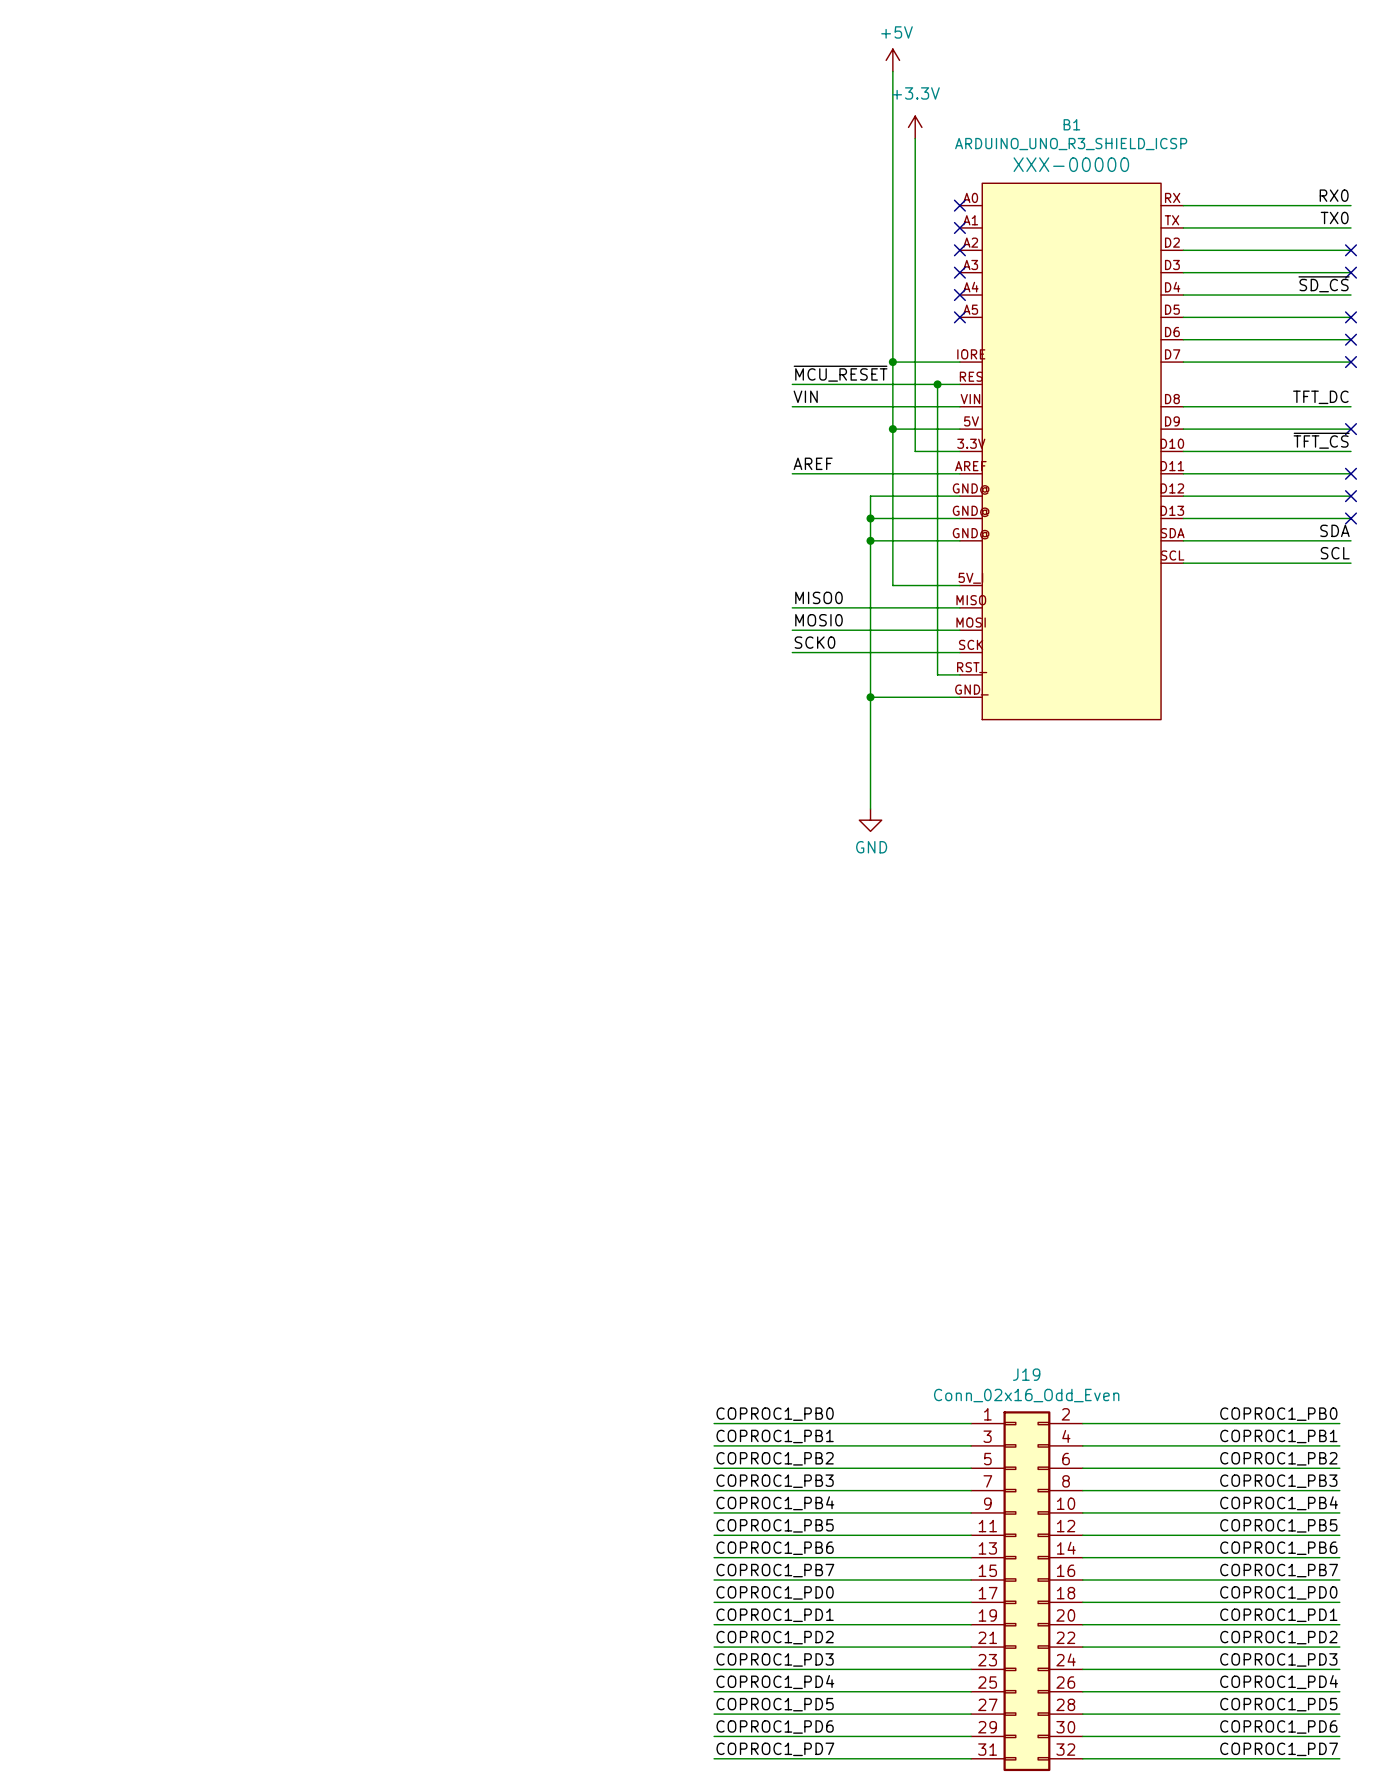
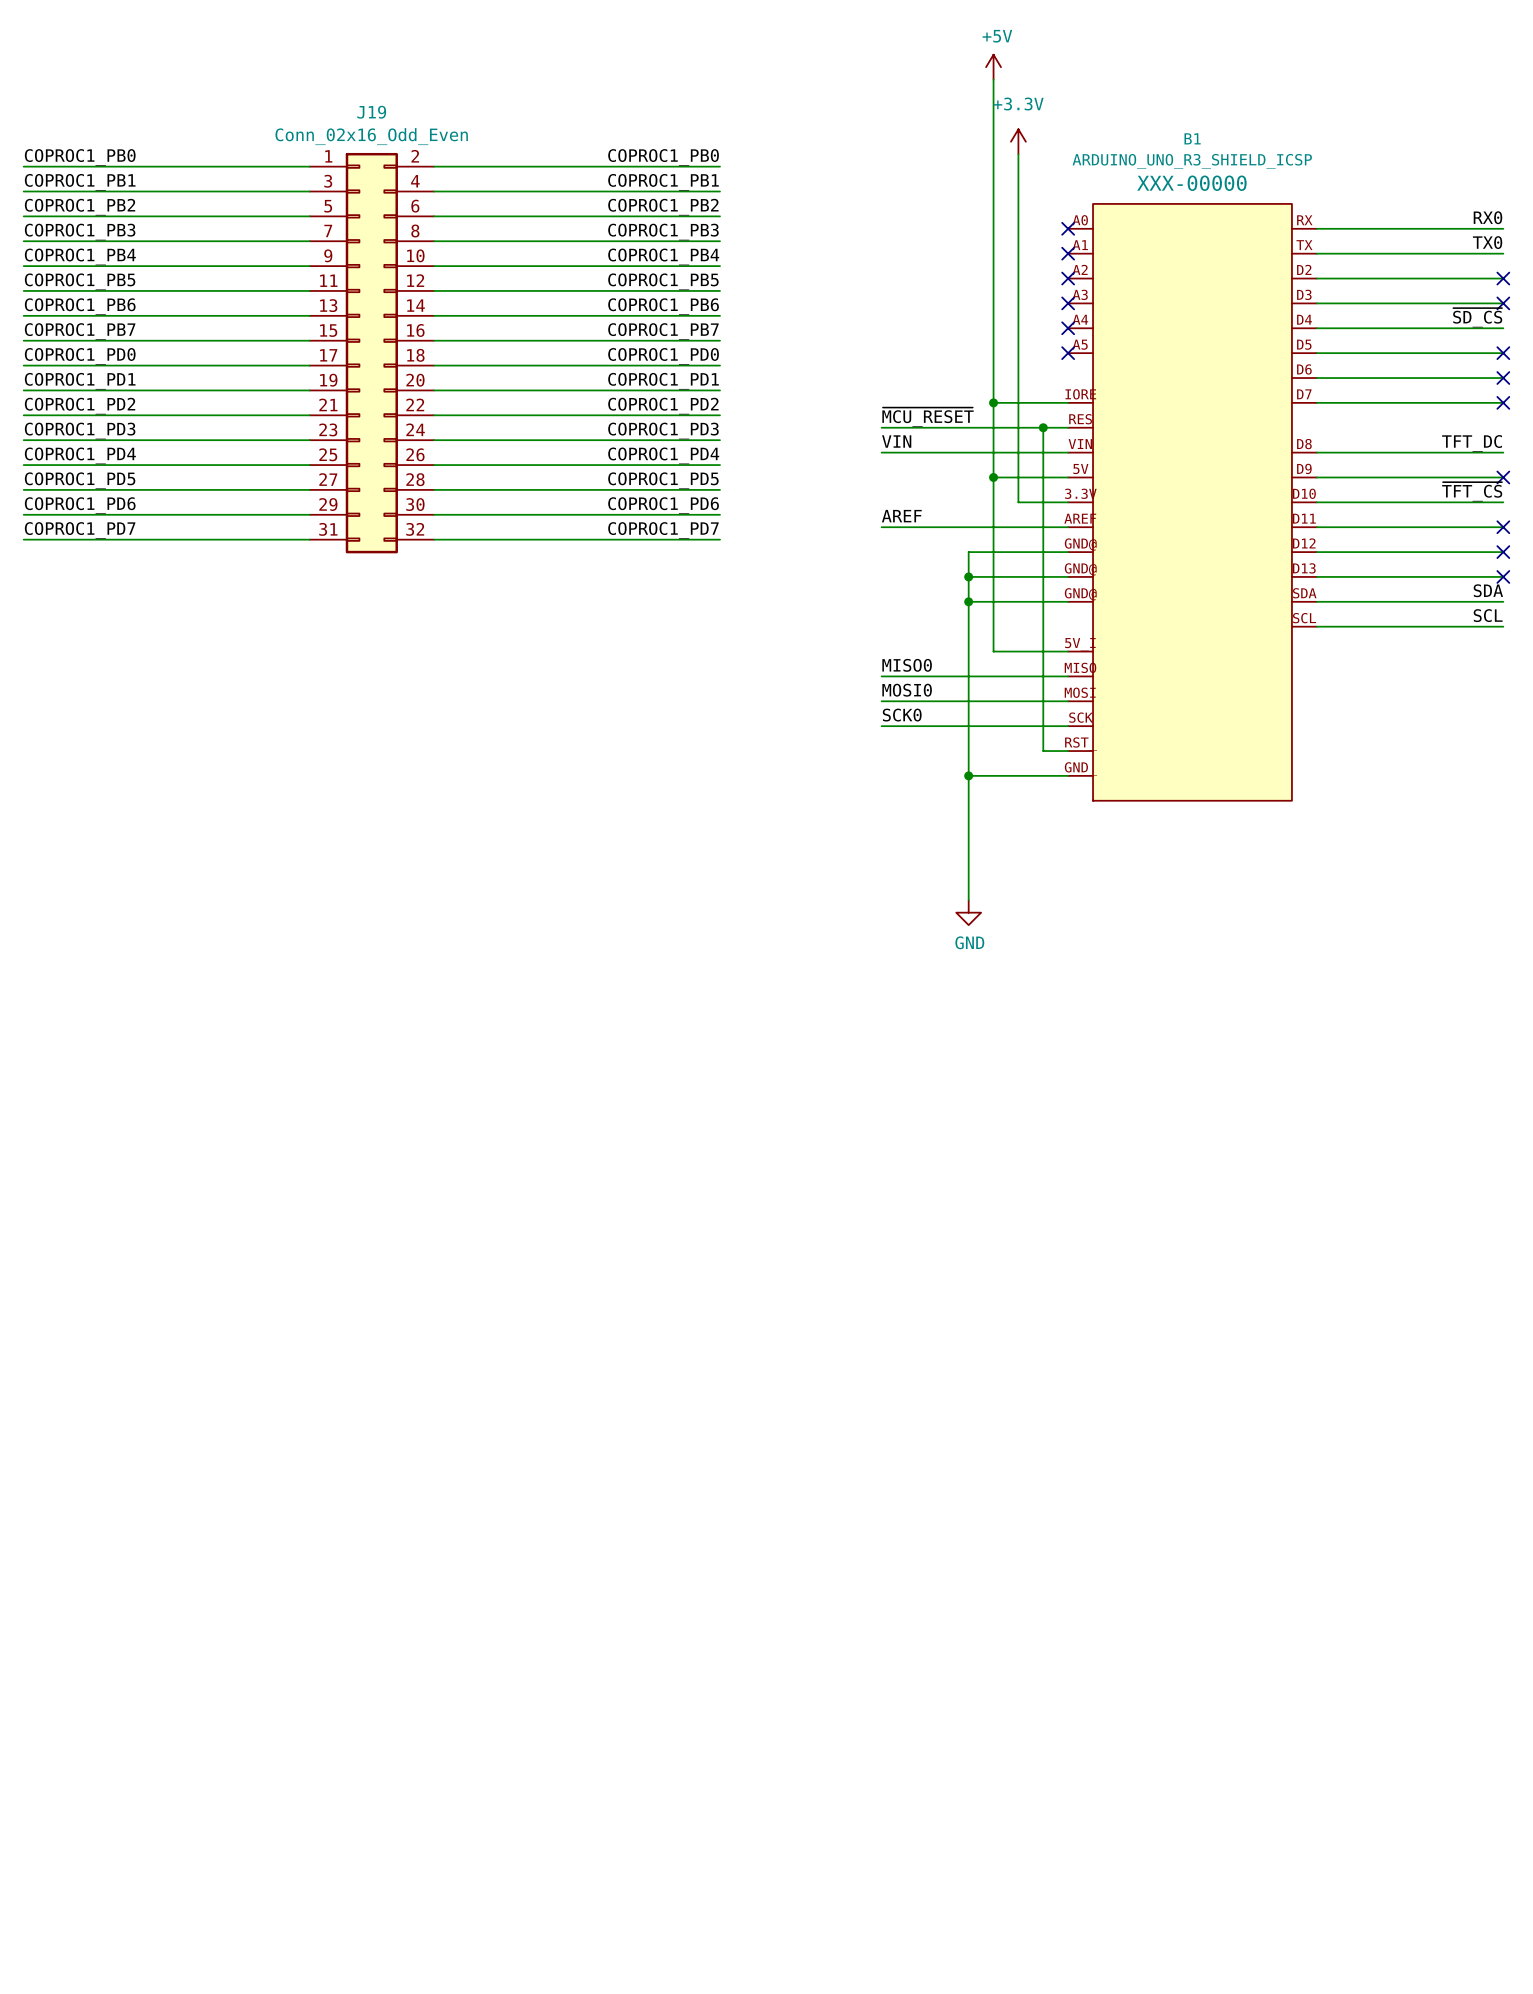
label: none -> COPROC1_PB0 (80, 157)
label: none -> COPROC1_PB0 (663, 157)
wire: none -> (23, 166) (309, 166)
wire: none -> (434, 166) (720, 166)
label: none -> COPROC1_PB1 (80, 182)
label: none -> COPROC1_PB1 (663, 182)
wire: none -> (23, 191) (309, 191)
wire: none -> (434, 191) (720, 191)
label: none -> COPROC1_PB2 (80, 207)
label: none -> COPROC1_PB2 (663, 207)
wire: none -> (23, 216) (309, 216)
wire: none -> (434, 216) (720, 216)
label: none -> COPROC1_PB3 (80, 232)
label: none -> COPROC1_PB3 (663, 232)
wire: none -> (23, 241) (309, 241)
wire: none -> (434, 241) (720, 241)
label: none -> COPROC1_PB4 (80, 256)
label: none -> COPROC1_PB4 (663, 256)
wire: none -> (23, 266) (309, 266)
wire: none -> (434, 266) (720, 266)
label: none -> COPROC1_PB5 (80, 281)
label: none -> COPROC1_PB5 (663, 281)
wire: none -> (23, 290) (309, 290)
wire: none -> (434, 290) (720, 290)
label: none -> COPROC1_PB6 (80, 306)
label: none -> COPROC1_PB6 (663, 306)
wire: none -> (23, 315) (309, 315)
wire: none -> (434, 315) (720, 315)
label: none -> COPROC1_PB7 (80, 331)
label: none -> COPROC1_PB7 (663, 331)
wire: none -> (23, 340) (309, 340)
wire: none -> (434, 340) (720, 340)
label: none -> COPROC1_PD0 (80, 356)
label: none -> COPROC1_PD0 (663, 356)
wire: none -> (23, 365) (309, 365)
wire: none -> (434, 365) (720, 365)
label: none -> COPROC1_PD1 (80, 381)
label: none -> COPROC1_PD1 (663, 381)
wire: none -> (23, 390) (309, 390)
wire: none -> (434, 390) (720, 390)
label: none -> COPROC1_PD2 (80, 406)
label: none -> COPROC1_PD2 (663, 406)
wire: none -> (23, 415) (309, 415)
wire: none -> (434, 415) (720, 415)
label: none -> COPROC1_PD3 (80, 430)
label: none -> COPROC1_PD3 (663, 430)
wire: none -> (23, 440) (309, 440)
wire: none -> (434, 440) (720, 440)
label: none -> COPROC1_PD4 (80, 455)
label: none -> COPROC1_PD4 (663, 455)
wire: none -> (23, 465) (309, 465)
wire: none -> (434, 465) (720, 465)
label: none -> COPROC1_PD5 (80, 480)
label: none -> COPROC1_PD5 (663, 480)
wire: none -> (23, 489) (309, 489)
wire: none -> (434, 489) (720, 489)
label: none -> COPROC1_PD6 (80, 505)
label: none -> COPROC1_PD6 (663, 505)
wire: none -> (23, 514) (309, 514)
wire: none -> (434, 514) (720, 514)
label: none -> COPROC1_PD7 (80, 530)
label: none -> COPROC1_PD7 (663, 530)
wire: none -> (23, 539) (309, 539)
wire: none -> (434, 539) (720, 539)
label: COPROC1_PB0 (775, 1414) -> none
label: COPROC1_PB0 (1278, 1414) -> none
wire: (714, 1423) (971, 1423) -> none
wire: (1082, 1423) (1339, 1423) -> none
label: COPROC1_PB1 (775, 1436) -> none
label: COPROC1_PB1 (1278, 1436) -> none
wire: (714, 1445) (971, 1445) -> none
wire: (1082, 1445) (1339, 1445) -> none
label: COPROC1_PB2 (775, 1458) -> none
label: COPROC1_PB2 (1278, 1458) -> none
wire: (714, 1468) (971, 1468) -> none
wire: (1082, 1468) (1339, 1468) -> none
label: COPROC1_PB3 (775, 1481) -> none
label: COPROC1_PB3 (1278, 1481) -> none
wire: (714, 1490) (971, 1490) -> none
wire: (1082, 1490) (1339, 1490) -> none
label: COPROC1_PB4 (775, 1503) -> none
label: COPROC1_PB4 (1279, 1503) -> none
wire: (714, 1512) (971, 1512) -> none
wire: (1082, 1512) (1339, 1512) -> none
label: COPROC1_PB5 (775, 1525) -> none
label: COPROC1_PB5 (1278, 1525) -> none
wire: (714, 1535) (971, 1535) -> none
wire: (1082, 1535) (1339, 1535) -> none
label: COPROC1_PB6 (775, 1548) -> none
label: COPROC1_PB6 (1278, 1548) -> none
wire: (714, 1557) (971, 1557) -> none
wire: (1082, 1557) (1339, 1557) -> none
label: COPROC1_PB7 (775, 1570) -> none
label: COPROC1_PB7 (1279, 1570) -> none
wire: (714, 1580) (971, 1580) -> none
wire: (1082, 1580) (1339, 1580) -> none
J19 position: (1026, 1591) -> (371, 353)
label: COPROC1_PD0 (775, 1592) -> none
label: COPROC1_PD0 (1278, 1592) -> none
wire: (714, 1602) (971, 1602) -> none
wire: (1082, 1602) (1339, 1602) -> none
label: COPROC1_PD1 (775, 1615) -> none
label: COPROC1_PD1 (1278, 1615) -> none
wire: (714, 1624) (971, 1624) -> none
wire: (1082, 1624) (1339, 1624) -> none
label: COPROC1_PD2 (775, 1637) -> none
label: COPROC1_PD2 (1278, 1637) -> none
wire: (714, 1647) (971, 1647) -> none
wire: (1082, 1647) (1339, 1647) -> none
label: COPROC1_PD3 (775, 1659) -> none
label: COPROC1_PD3 (1278, 1659) -> none
wire: (714, 1669) (971, 1669) -> none
wire: (1082, 1669) (1339, 1669) -> none
label: COPROC1_PD4 (775, 1682) -> none
label: COPROC1_PD4 (1279, 1682) -> none
wire: (714, 1691) (971, 1691) -> none
wire: (1082, 1691) (1339, 1691) -> none
label: COPROC1_PD5 (775, 1704) -> none
label: COPROC1_PD5 (1278, 1704) -> none
wire: (714, 1714) (971, 1714) -> none
wire: (1082, 1714) (1339, 1714) -> none
label: COPROC1_PD6 (775, 1726) -> none
label: COPROC1_PD6 (1278, 1726) -> none
wire: (714, 1736) (971, 1736) -> none
wire: (1082, 1736) (1339, 1736) -> none
label: COPROC1_PD7 (775, 1749) -> none
label: COPROC1_PD7 (1279, 1749) -> none
wire: (714, 1758) (971, 1758) -> none
wire: (1082, 1758) (1339, 1758) -> none

